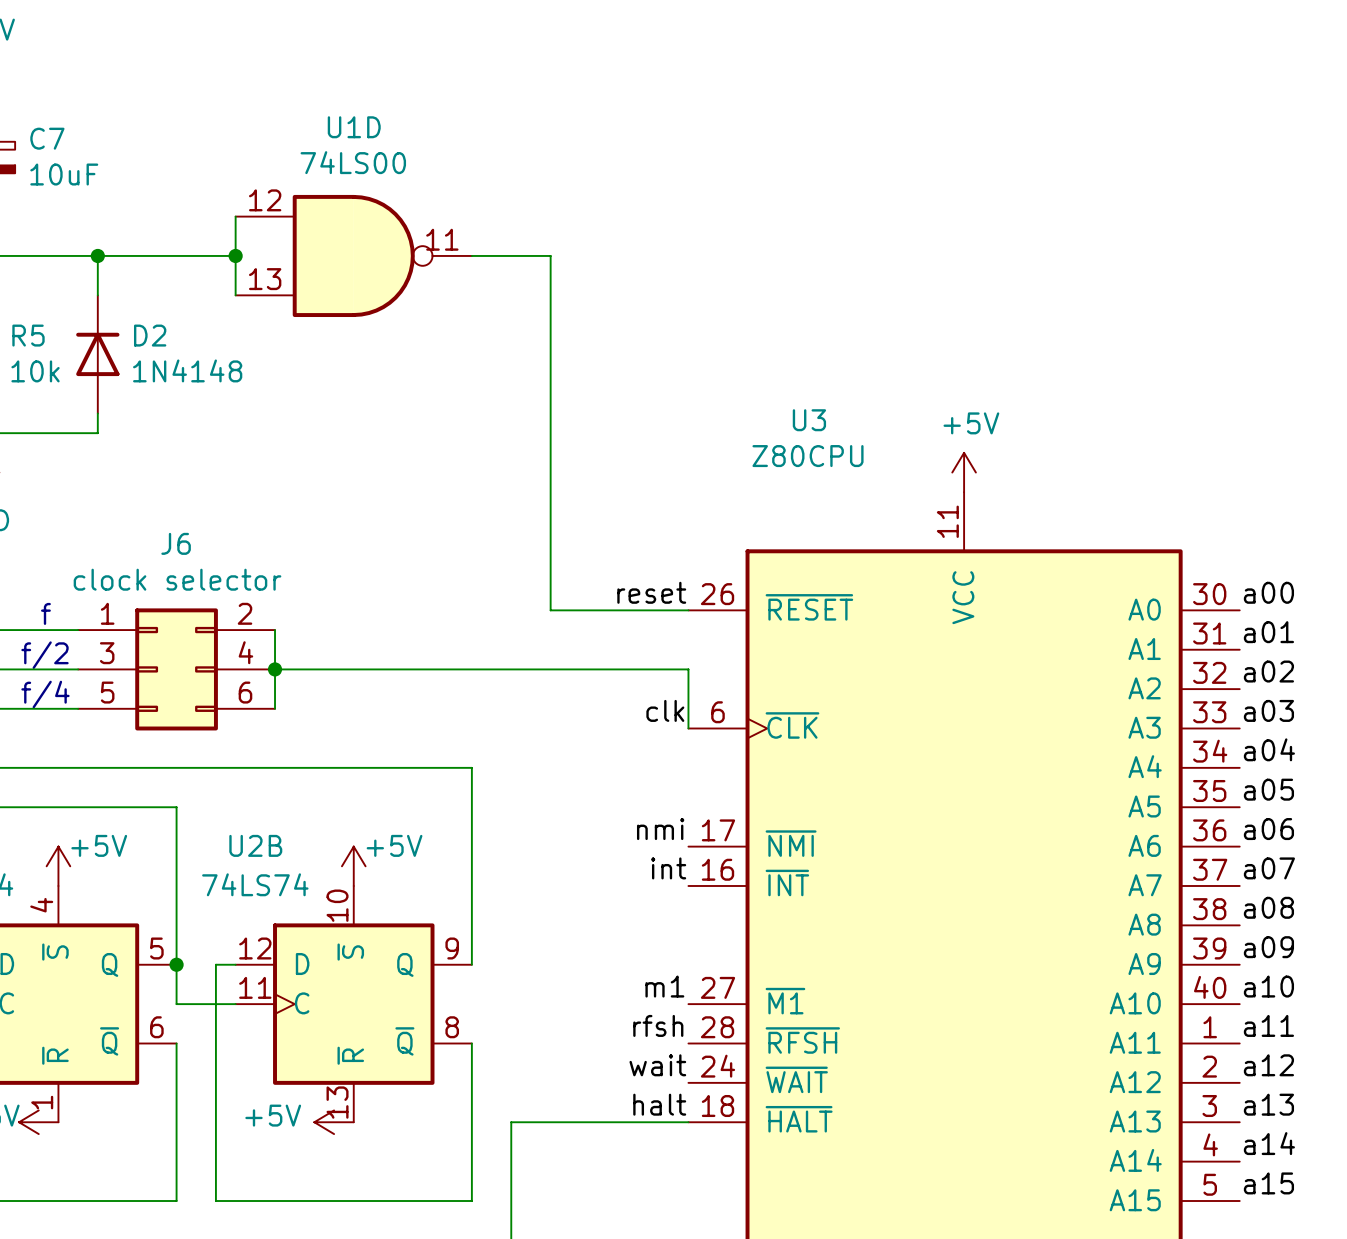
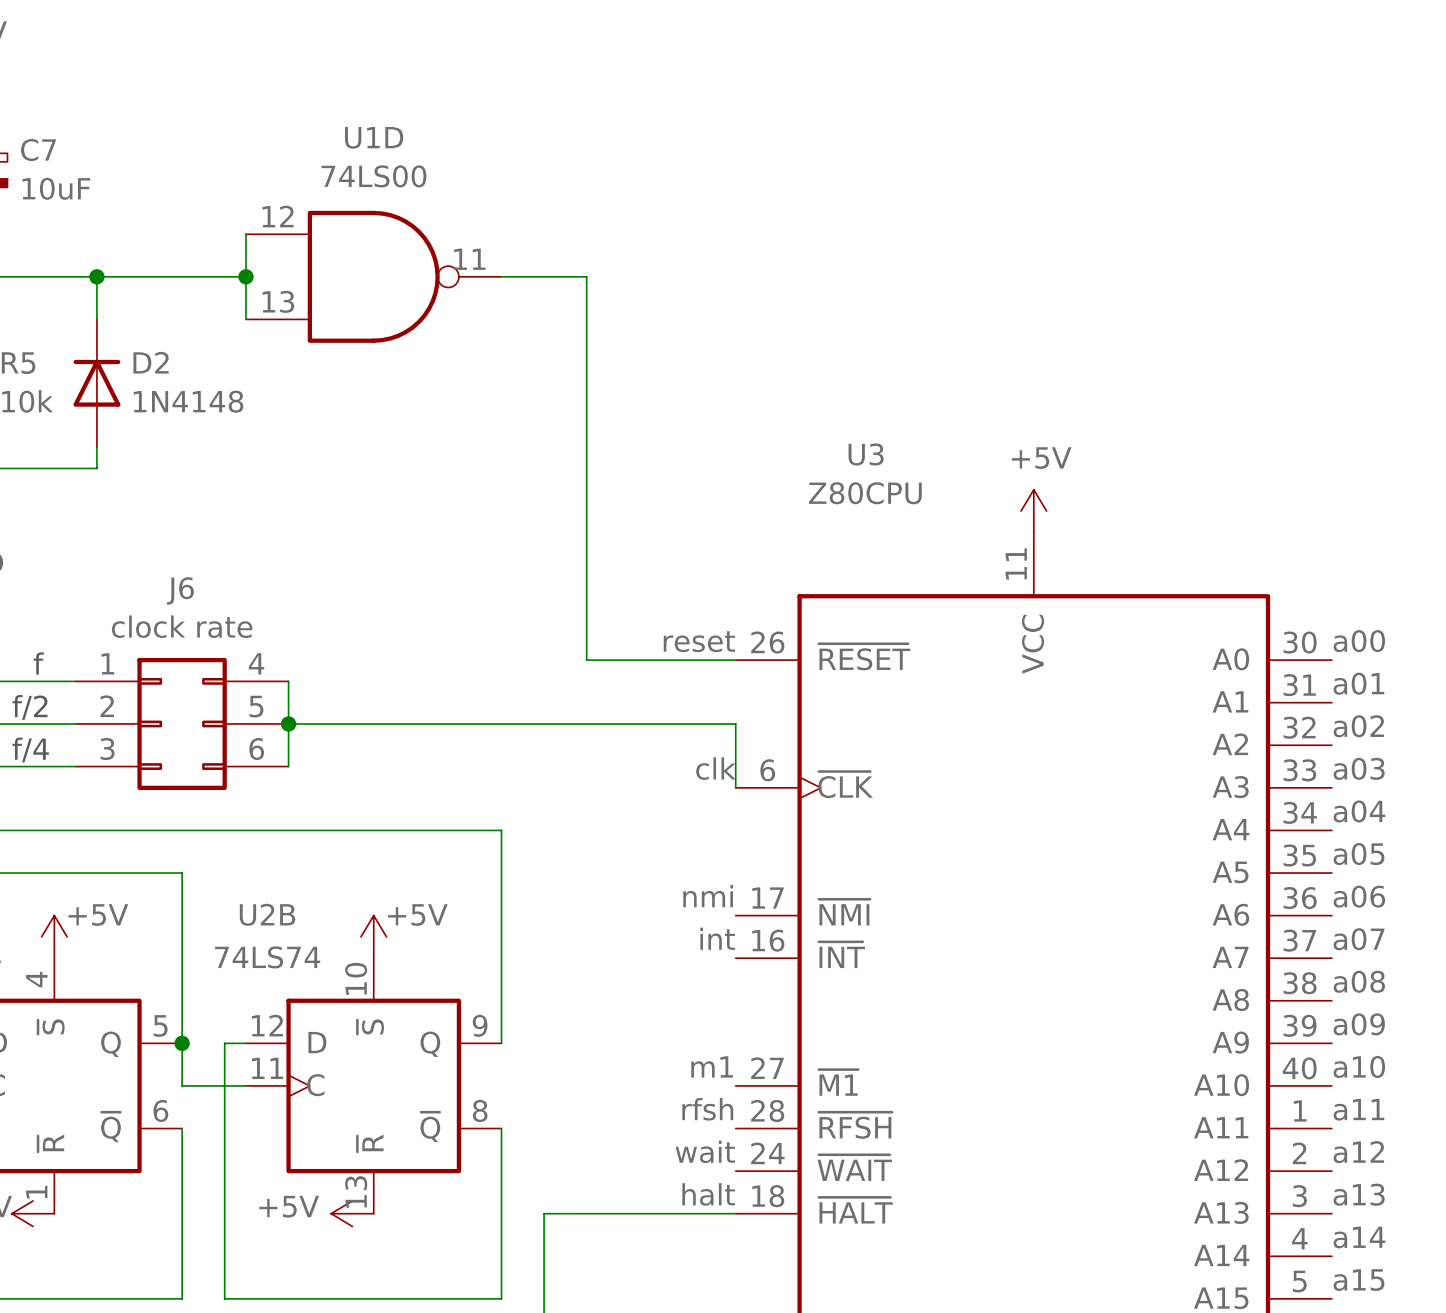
J6 value: clock selector (177, 579) -> clock rate (182, 626)
J6 pin number: 2 (245, 613) -> 4 (256, 663)
J6 pin number: 4 (245, 652) -> 5 (256, 706)
J6 pin number: 3 (107, 653) -> 2 (107, 706)
J6 pin number: 5 (107, 692) -> 3 (107, 749)

